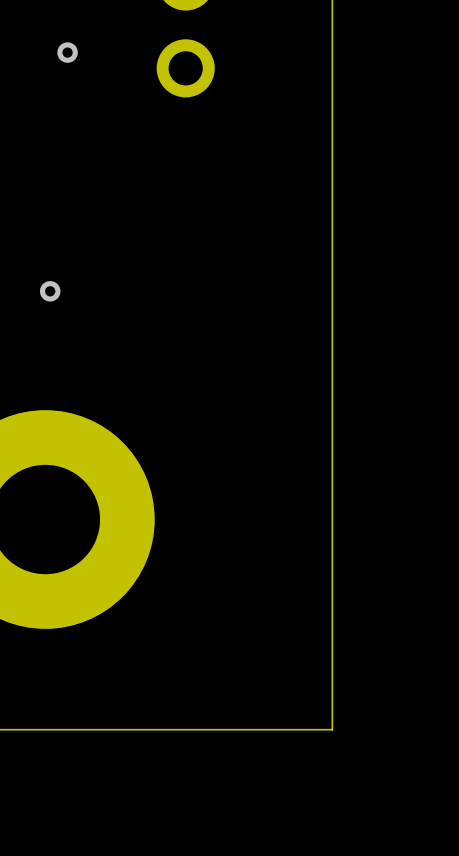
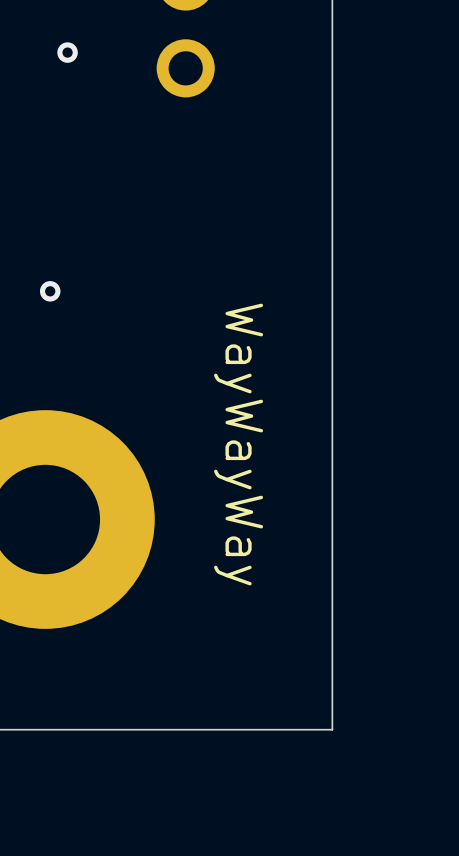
text: none -> WayWayWay (238, 444)

